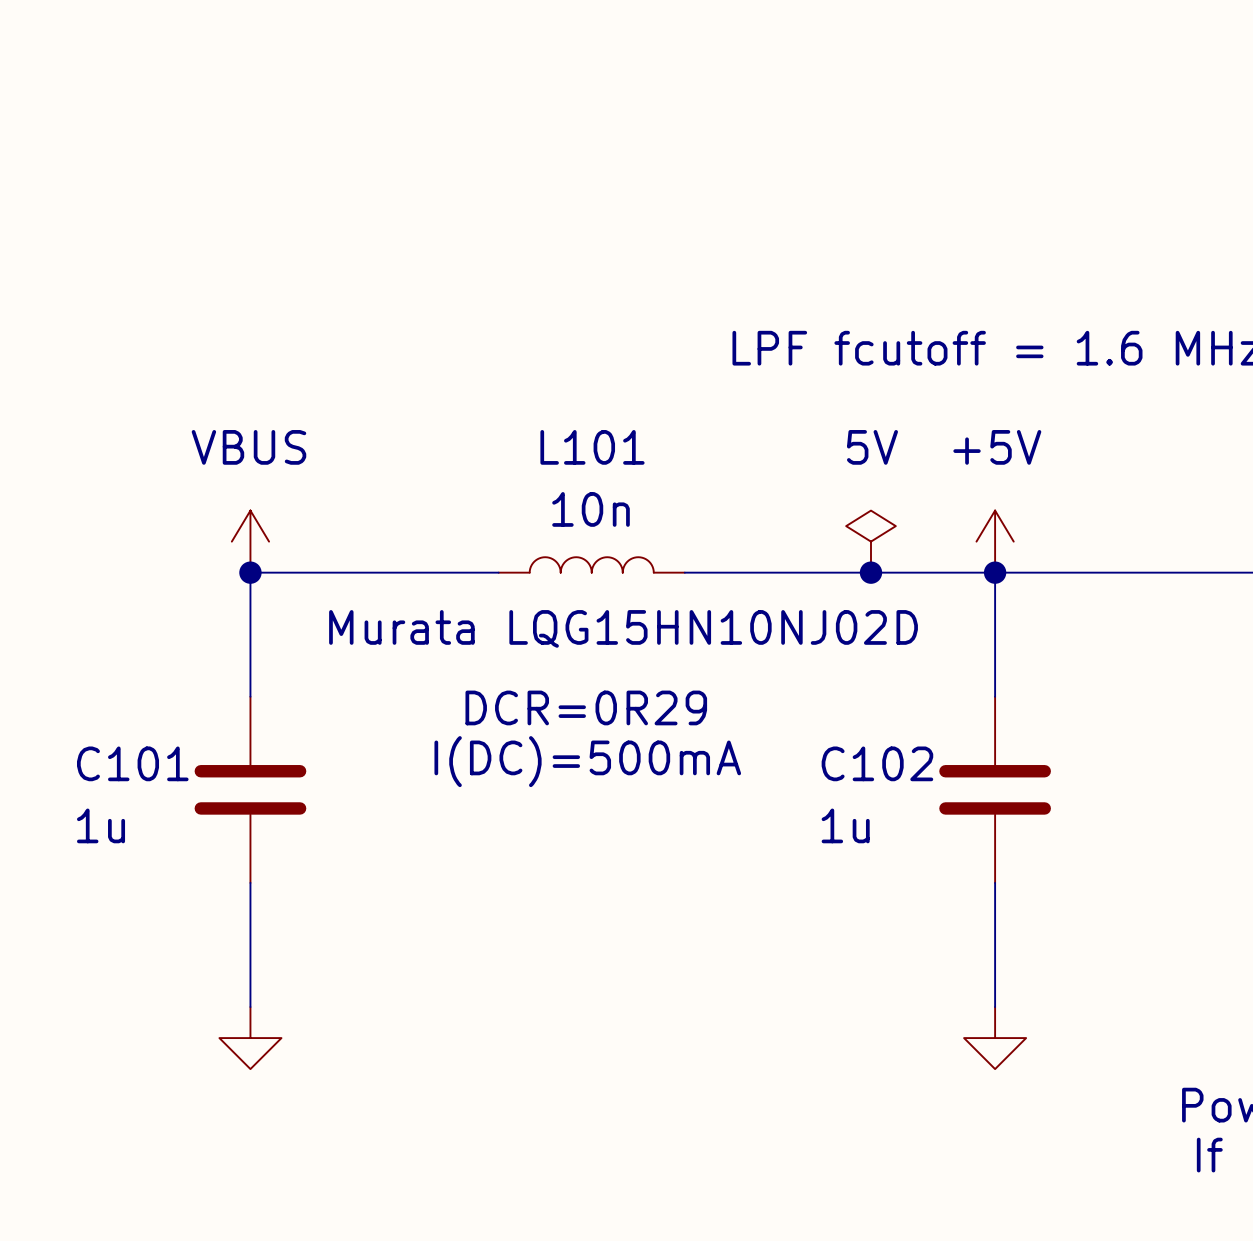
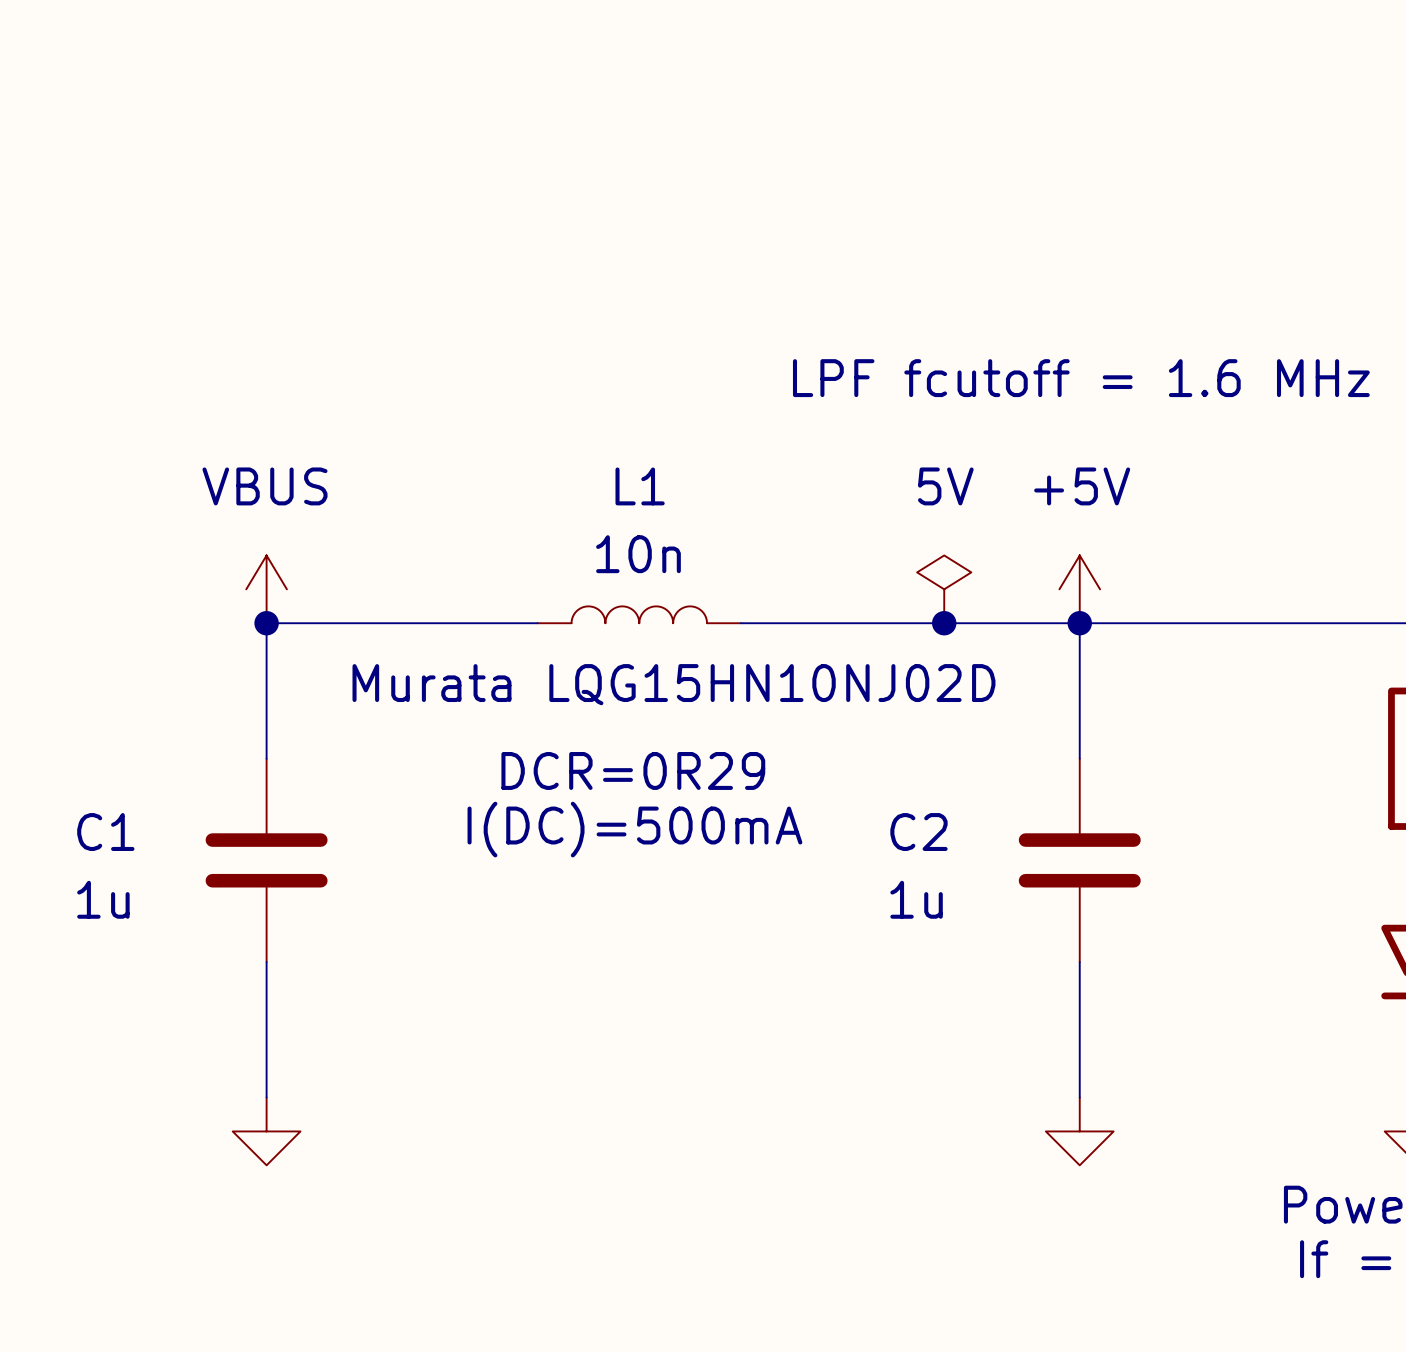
L101 name: L101 (592, 447) -> L1 (640, 486)
C101 name: C101 (132, 763) -> C1 (105, 832)
C102 name: C102 (877, 763) -> C2 (918, 832)

